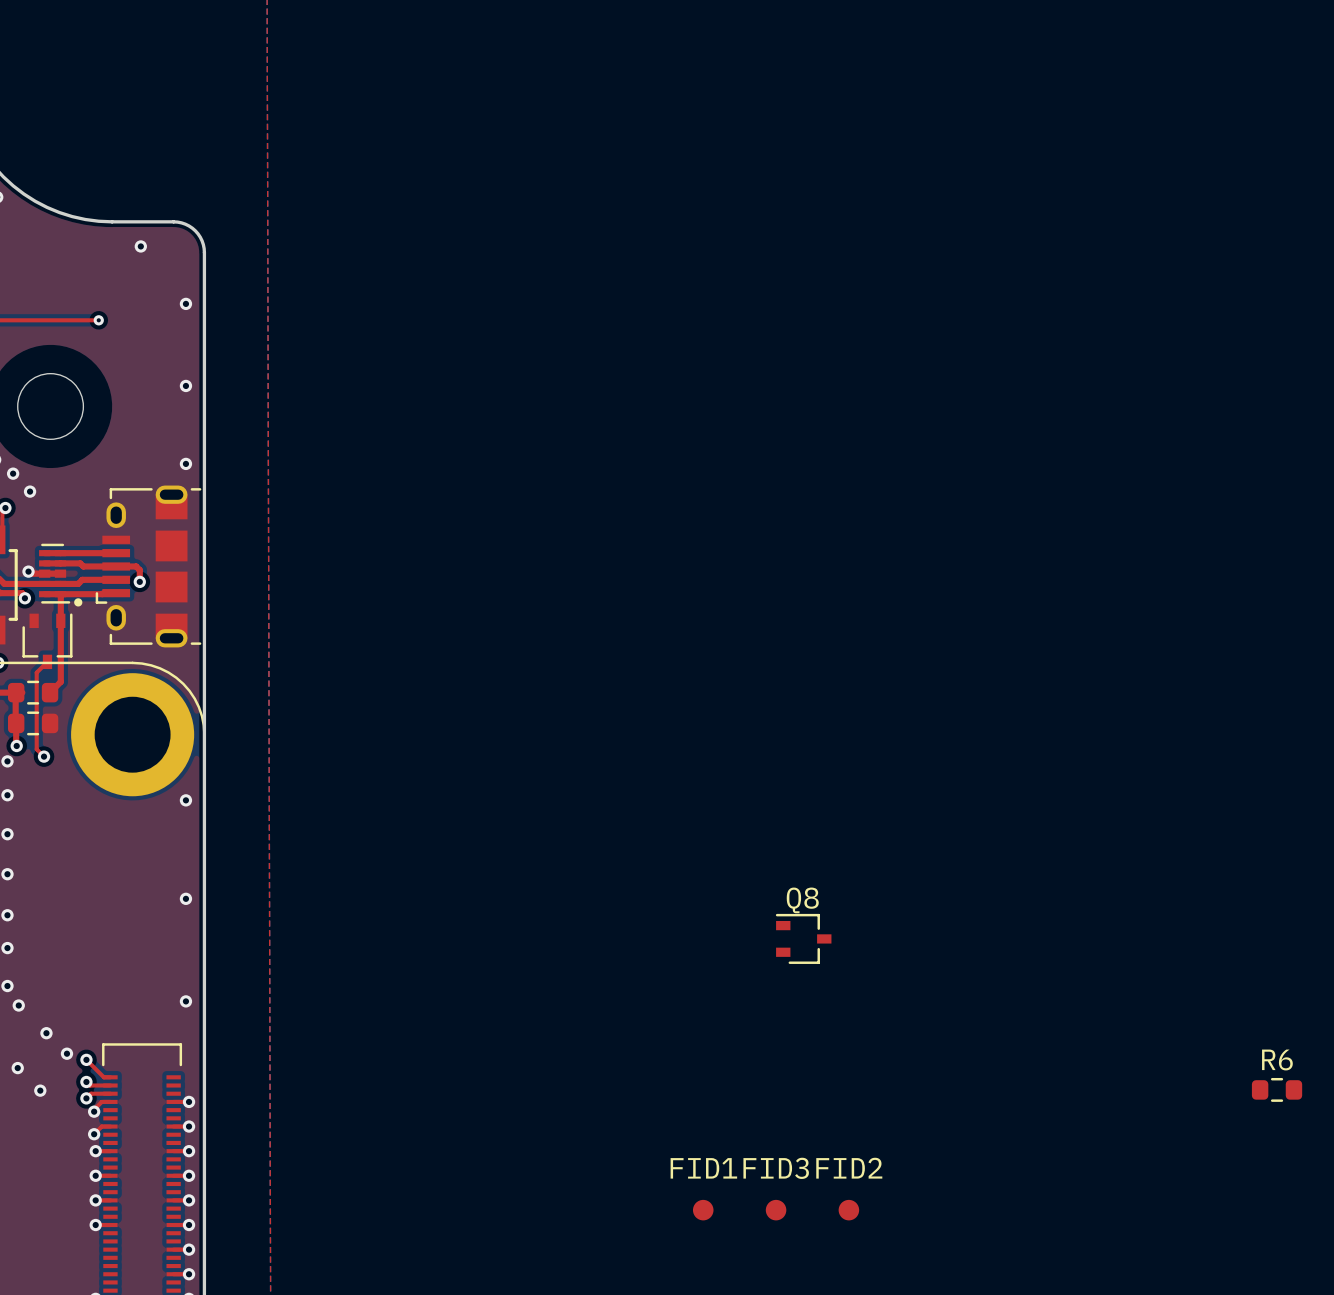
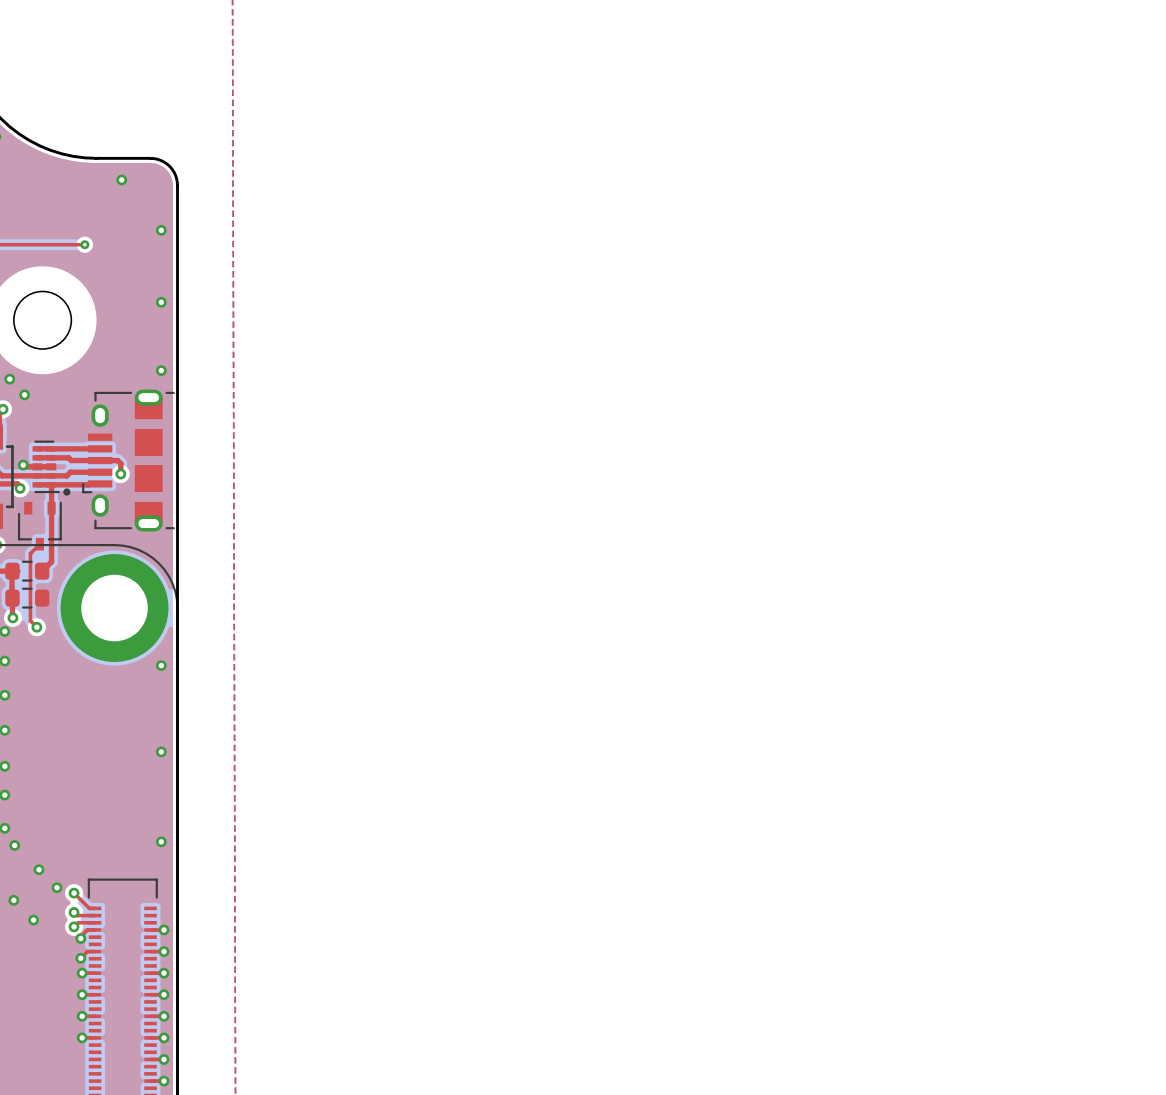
Q8: (803, 938) -> none
R6: (1277, 1089) -> none
FID1: (703, 1210) -> none
FID3: (776, 1210) -> none
FID2: (848, 1210) -> none

